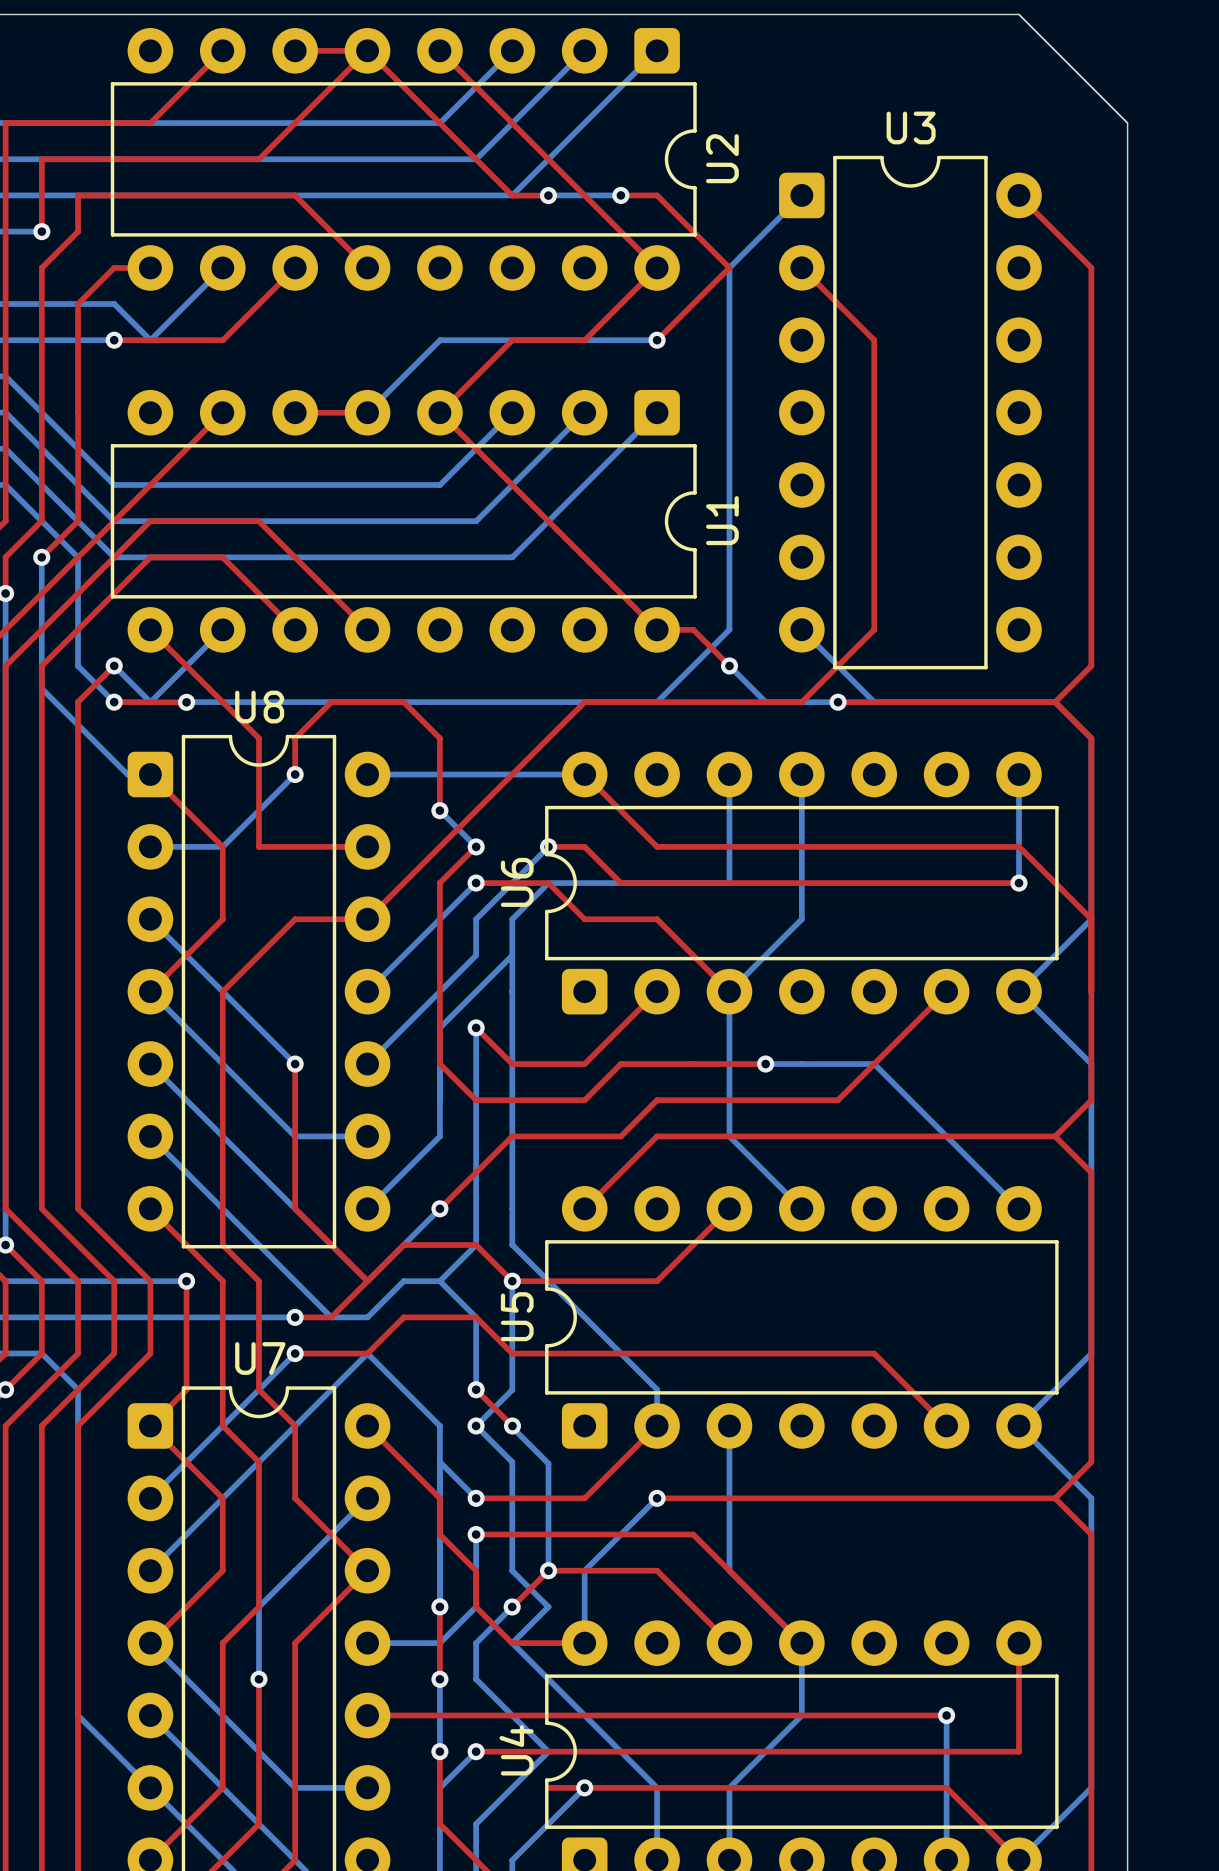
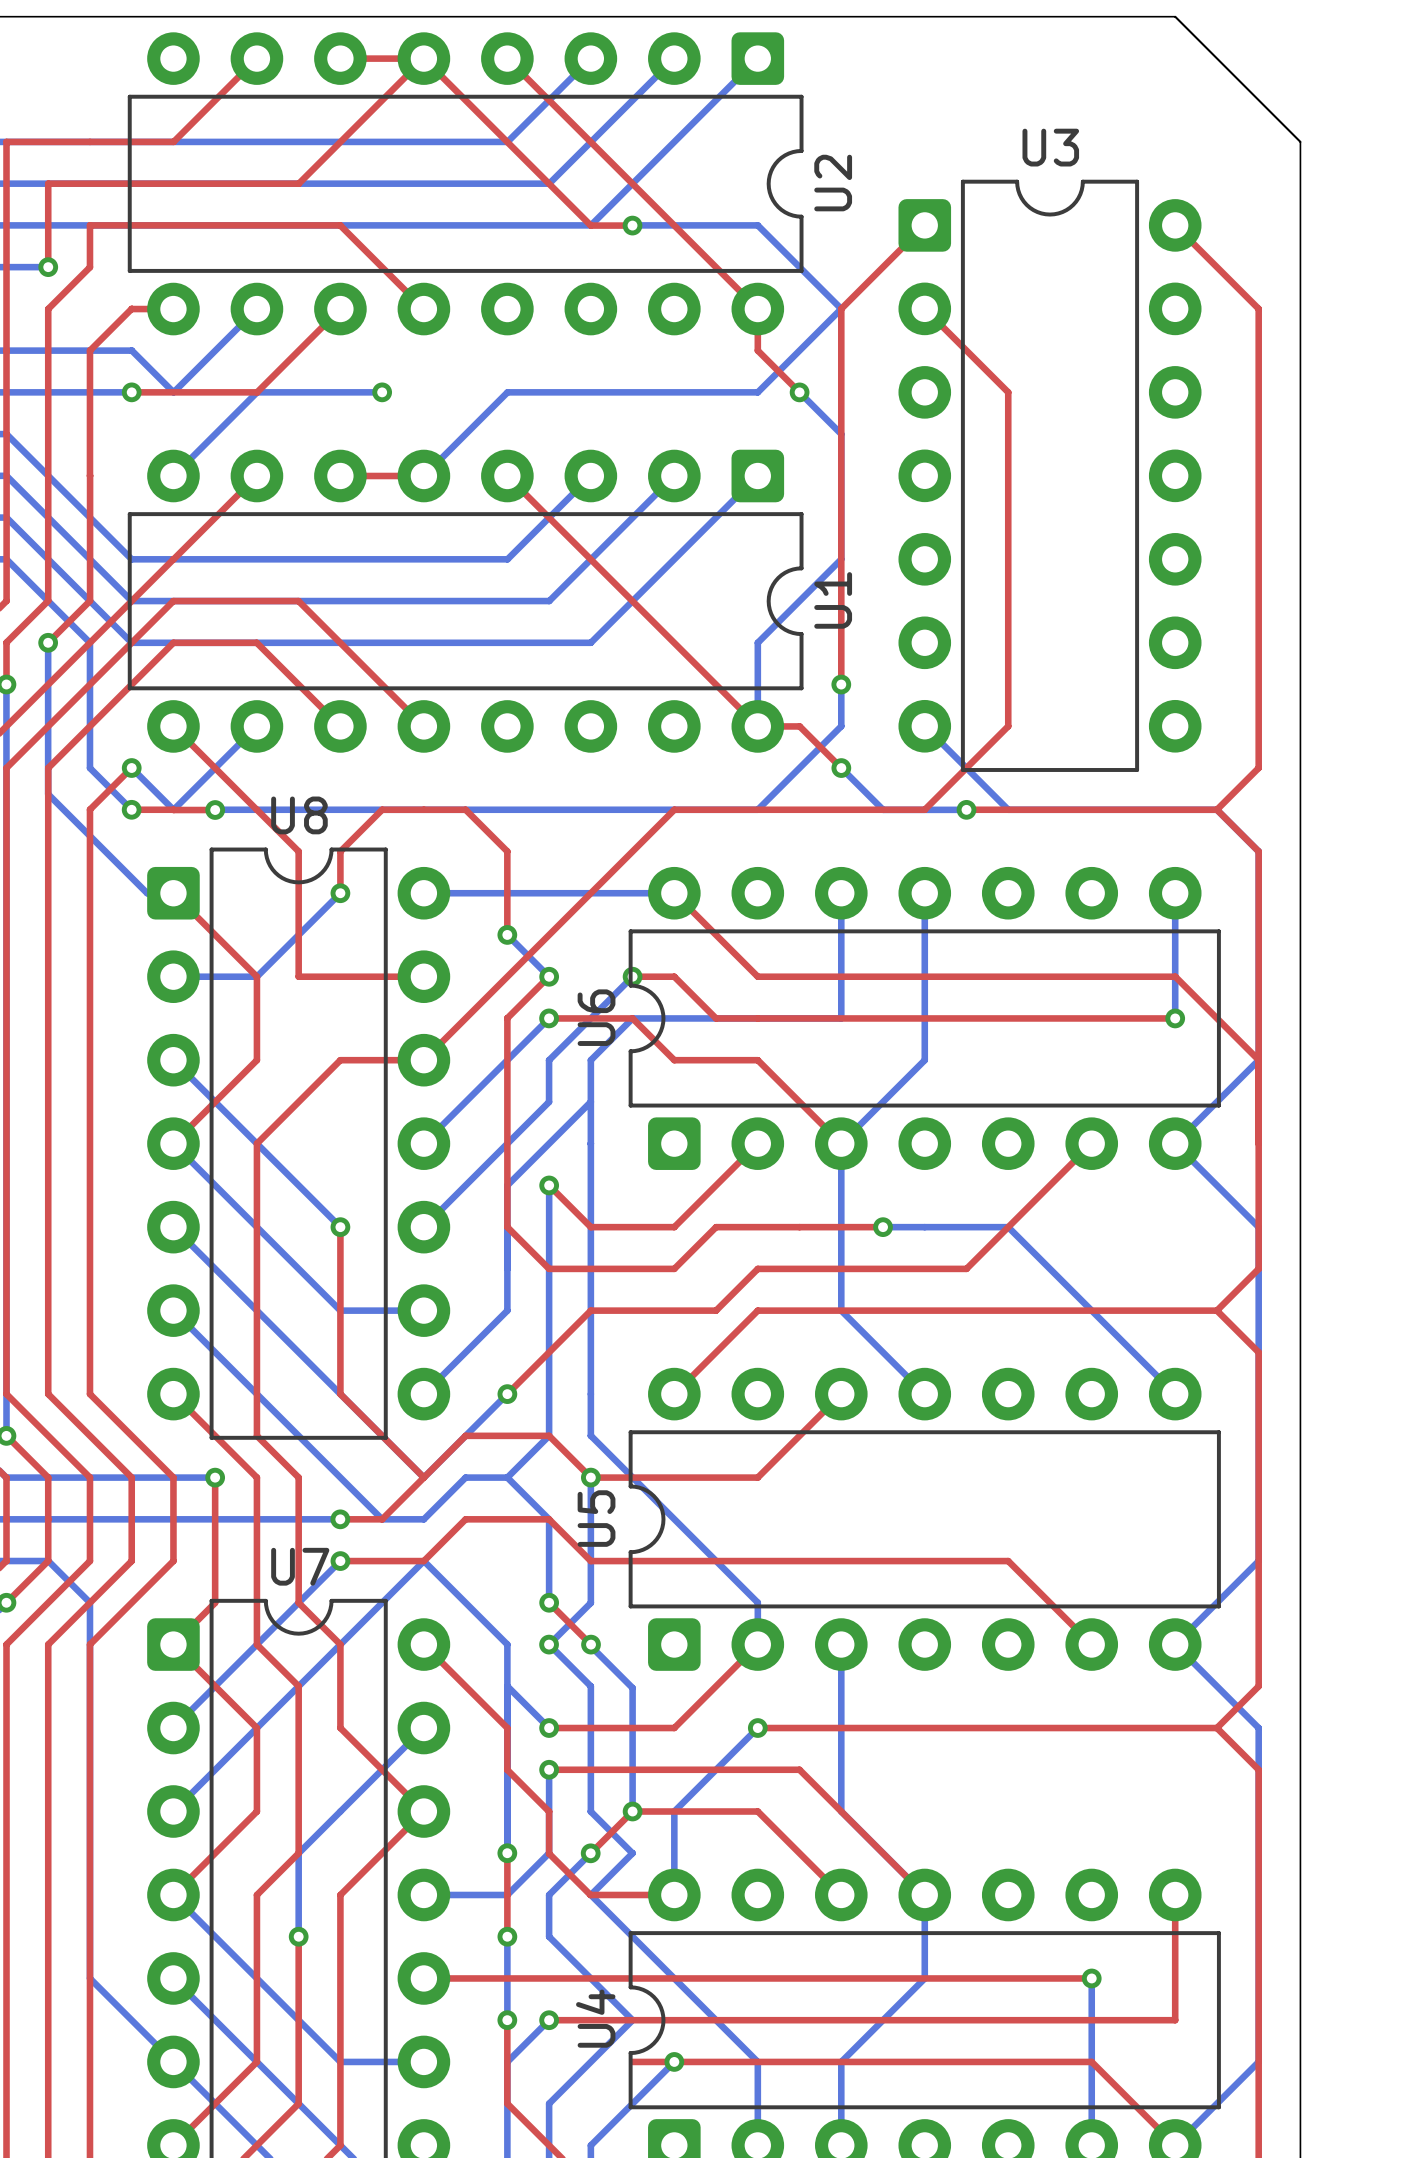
bottom track: none -> (716, 225) (757, 225) (841, 308) (757, 392)
top track: (620, 195) (657, 195) (729, 267) (657, 340) -> none
via: (620, 195) -> none
bottom track: (801, 195) (729, 267) (729, 376) -> (799, 392) (841, 434)
top track: none -> (924, 225) (841, 308) (841, 684)
top track: (657, 267) (584, 340) (512, 340) (439, 412) -> (757, 309) (757, 350) (799, 392)
bottom track: none -> (382, 392) (257, 392) (173, 476)
via: none -> (382, 392)
via position: (657, 340) -> (799, 392)
bottom track: (729, 484) (729, 593) -> (841, 559) (757, 642) (757, 726)
via: none -> (841, 684)

